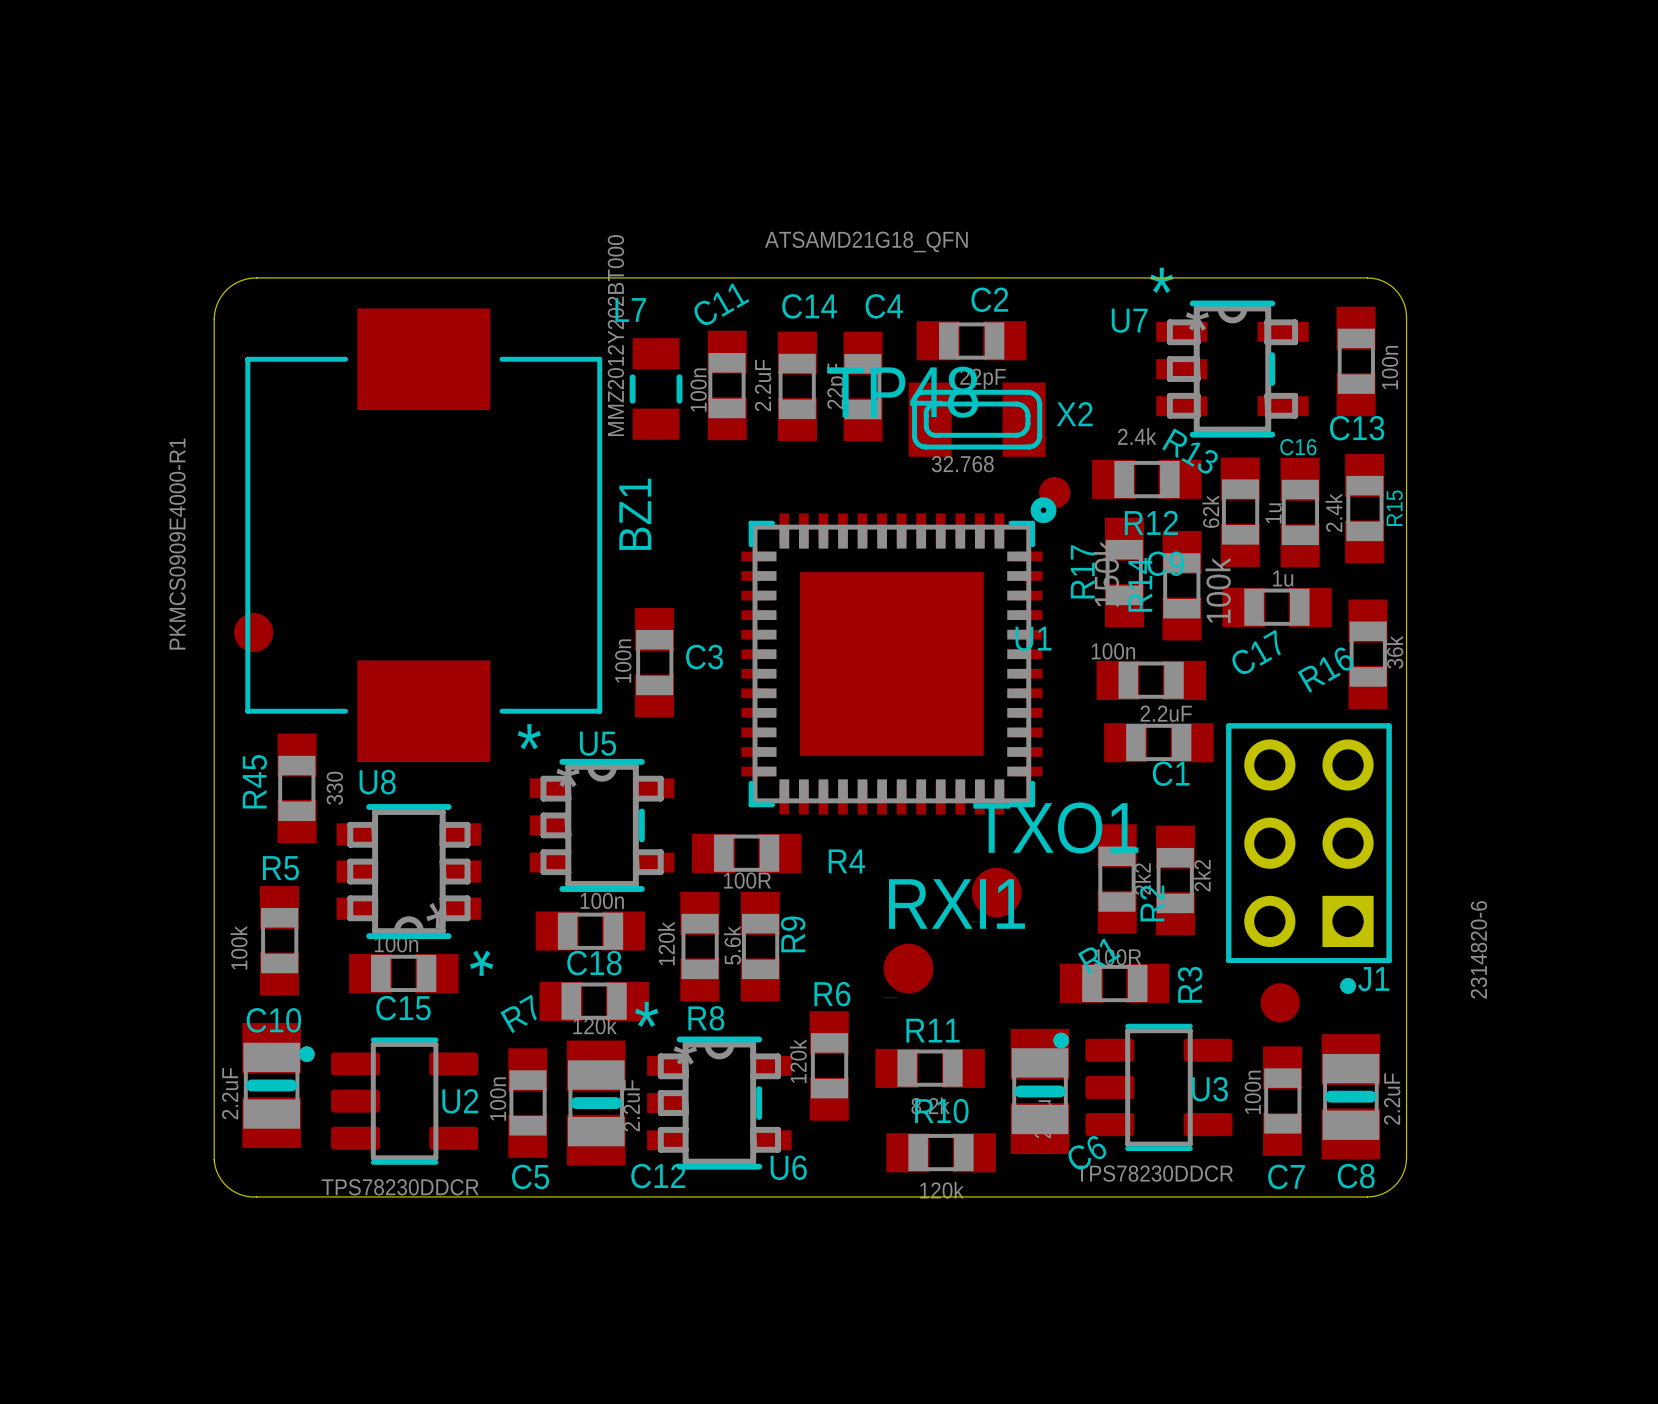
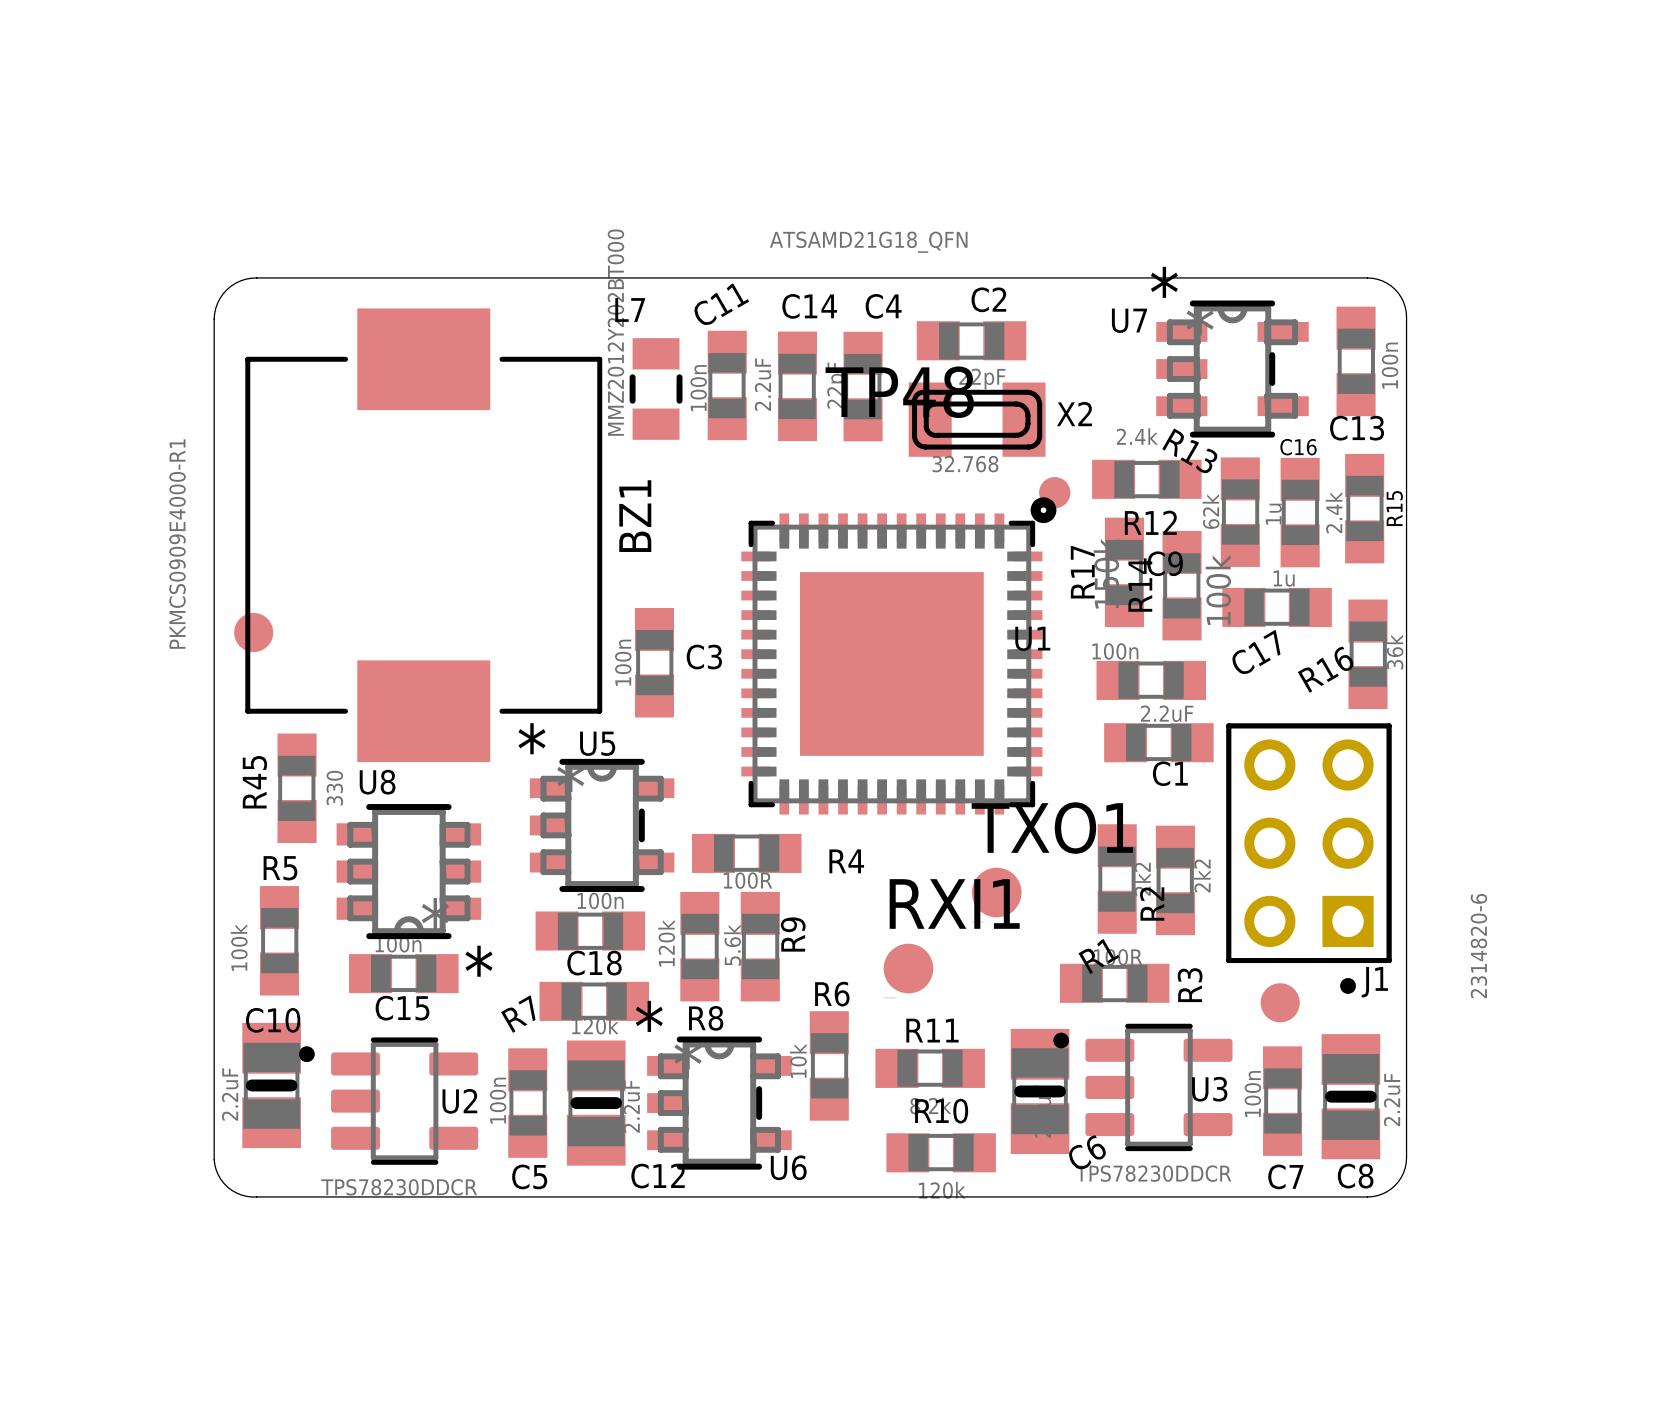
R6 value: 120k (798, 1061) -> 10k (798, 1060)

